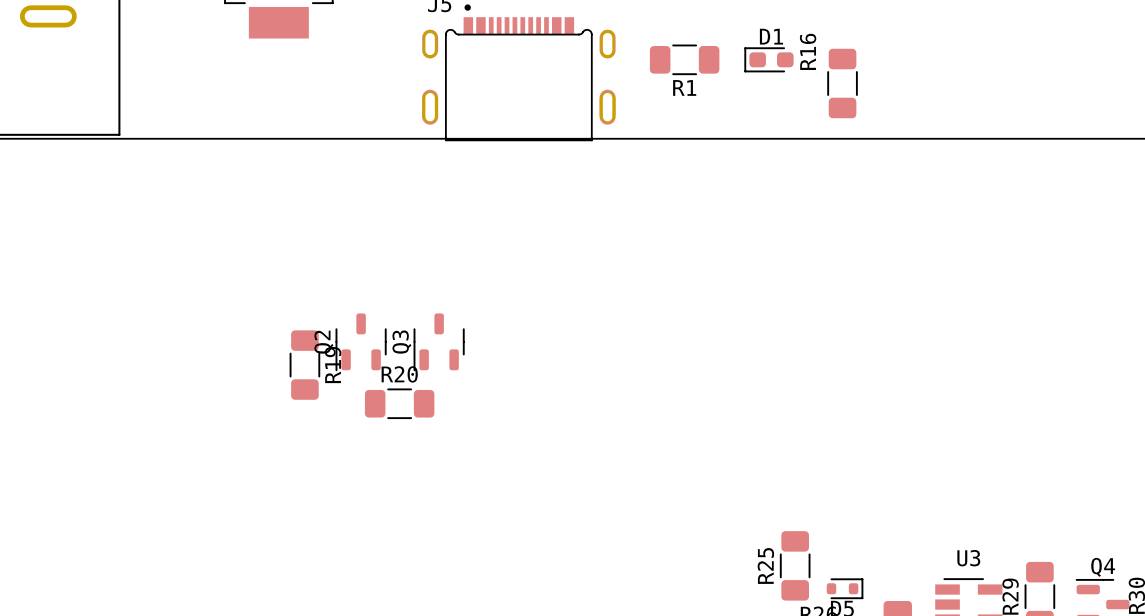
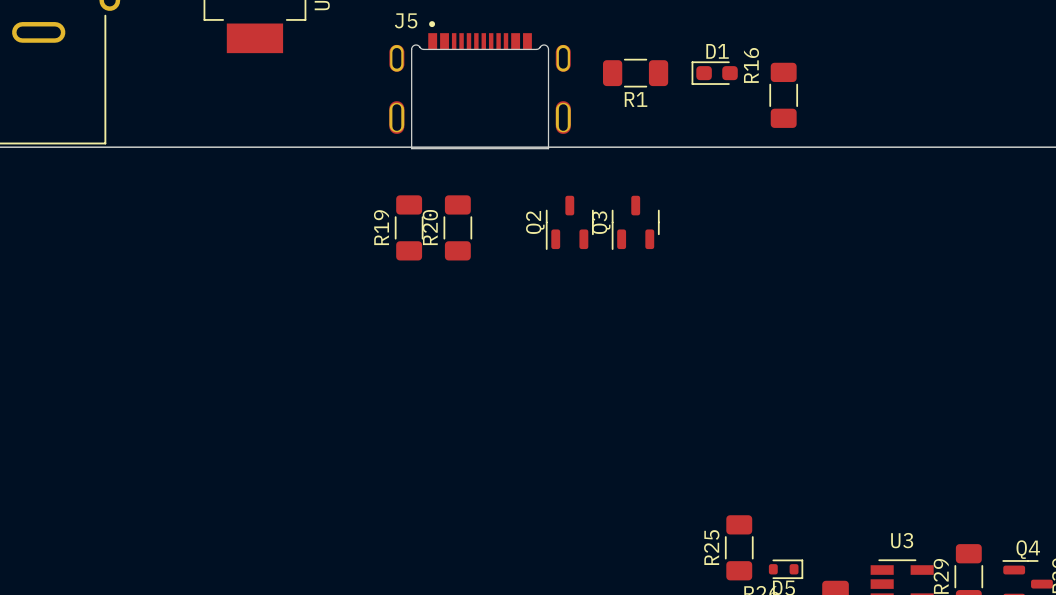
Q2 position: (361, 342) -> (569, 222)
Q3 position: (439, 342) -> (635, 222)
R19 position: (304, 365) -> (409, 227)
R19 name position: R19 (333, 365) -> R19 (381, 227)
R20 name position: R20 (399, 374) -> R20 (430, 227)
R20 rotation: 0° (399, 403) -> 90° clockwise (457, 227)
R20 position: (399, 403) -> (457, 227)

